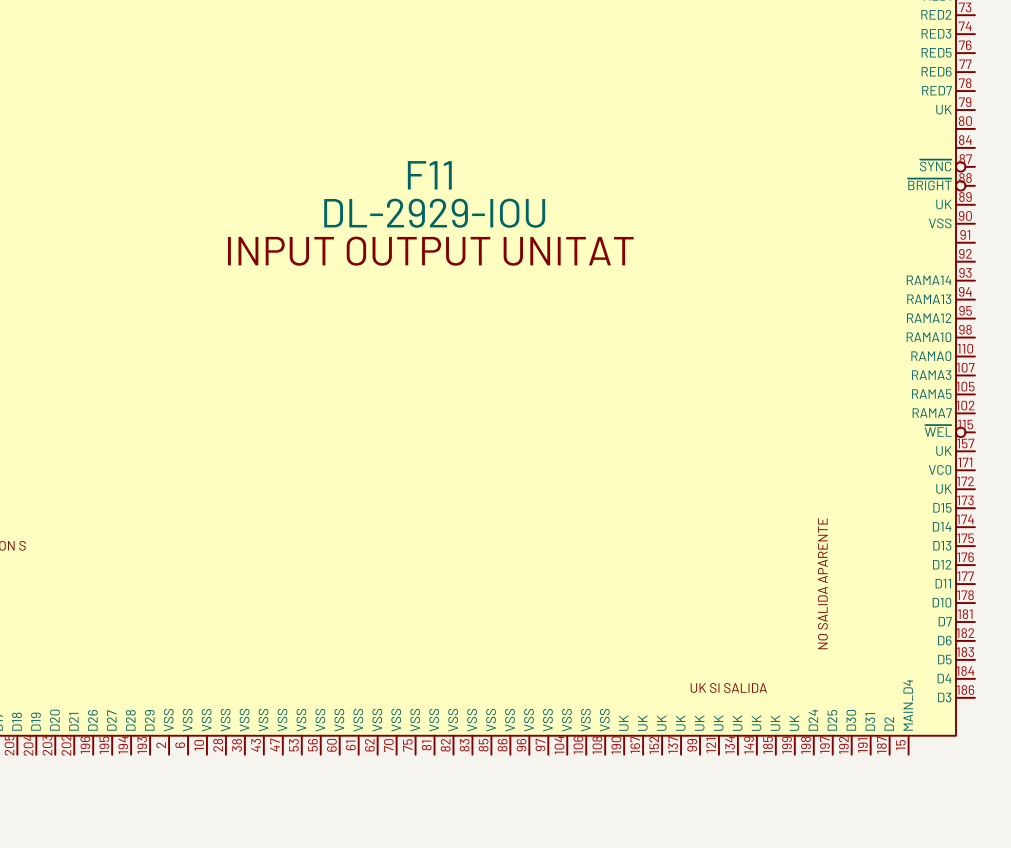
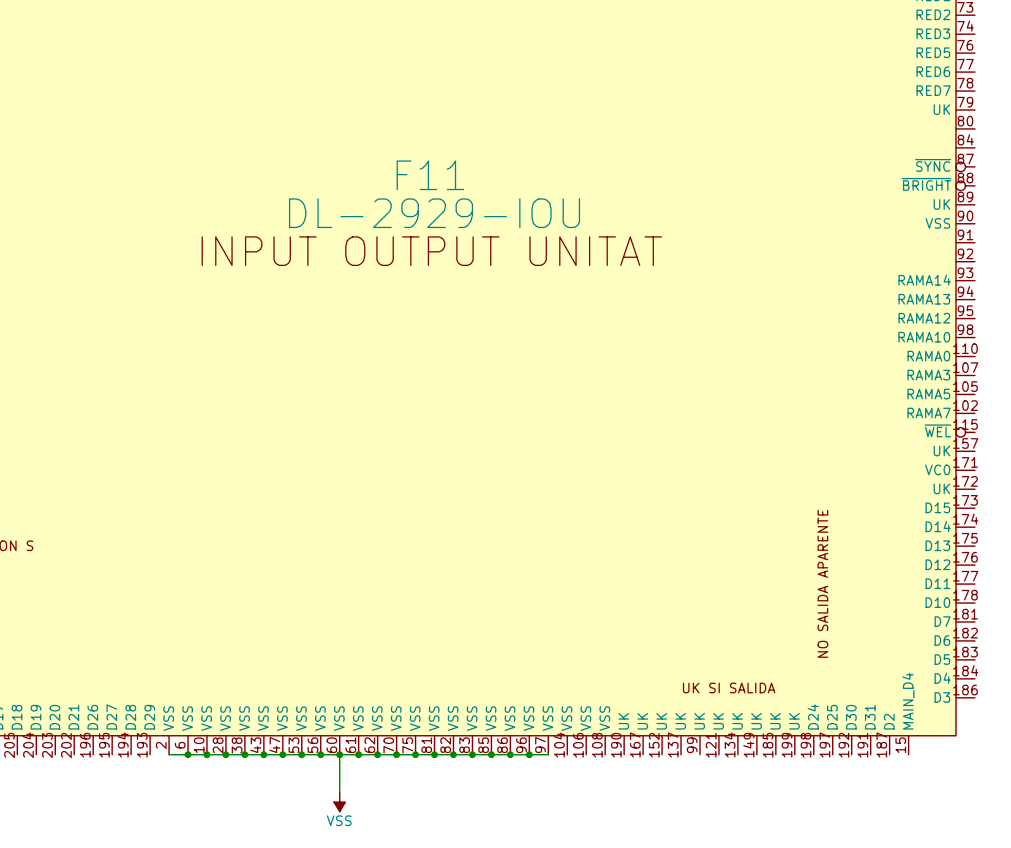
wire: none -> (169, 754) (548, 754)
junction: none -> (188, 754)
junction: none -> (206, 754)
junction: none -> (225, 754)
junction: none -> (244, 754)
junction: none -> (263, 754)
junction: none -> (282, 754)
junction: none -> (301, 754)
junction: none -> (320, 754)
wire: none -> (339, 754) (339, 792)
junction: none -> (339, 754)
junction: none -> (358, 754)
junction: none -> (377, 754)
junction: none -> (396, 754)
junction: none -> (415, 754)
junction: none -> (434, 754)
junction: none -> (453, 754)
junction: none -> (472, 754)
junction: none -> (491, 754)
junction: none -> (510, 754)
junction: none -> (529, 754)
power symbol: none -> VSS (339, 802)

